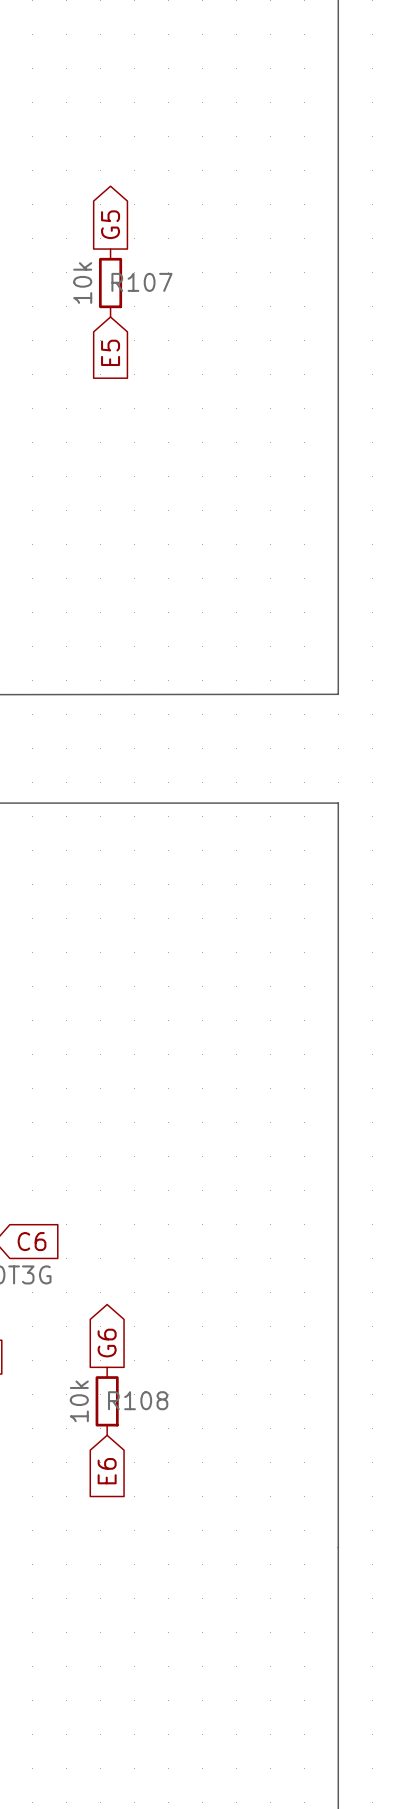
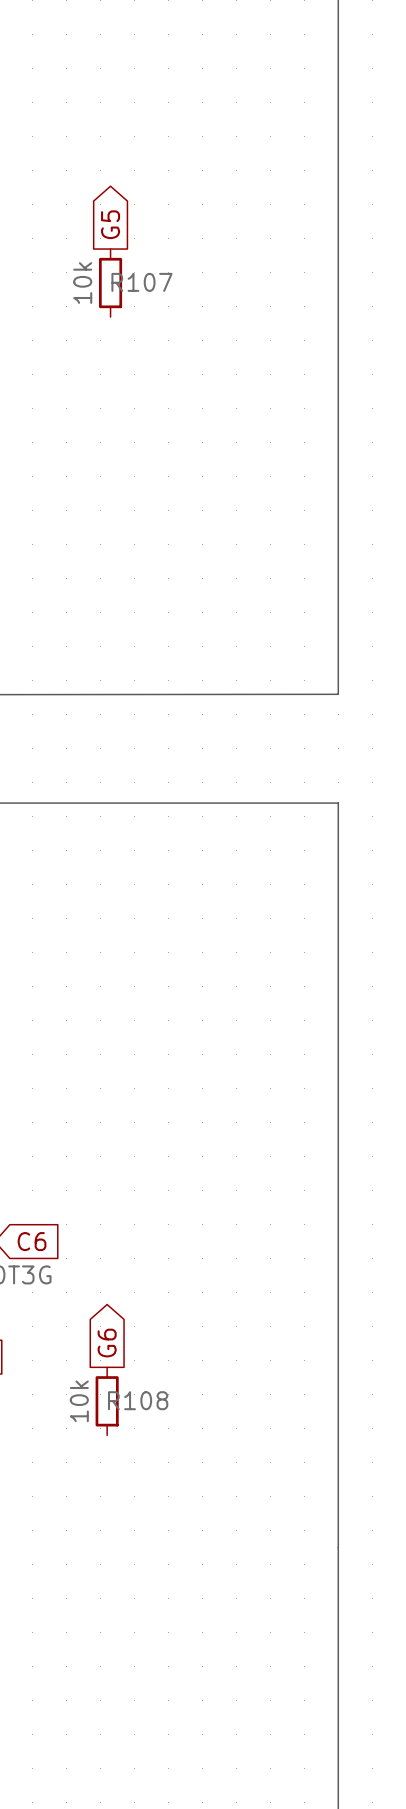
global label: E5 (110, 352) -> none
global label: E6 (107, 1471) -> none

